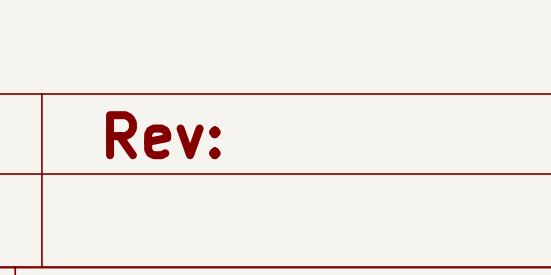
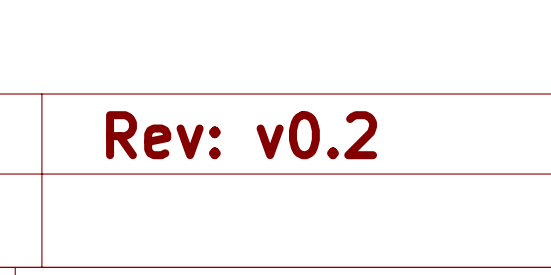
title block: Rev: (163, 135) -> Rev: v0.2 (241, 135)

